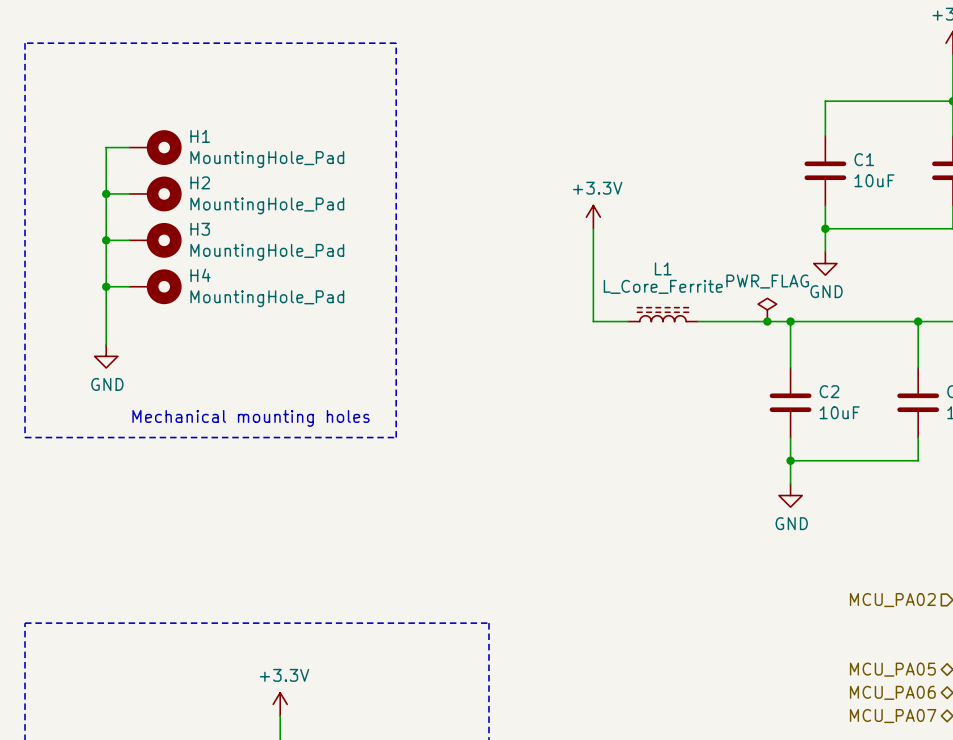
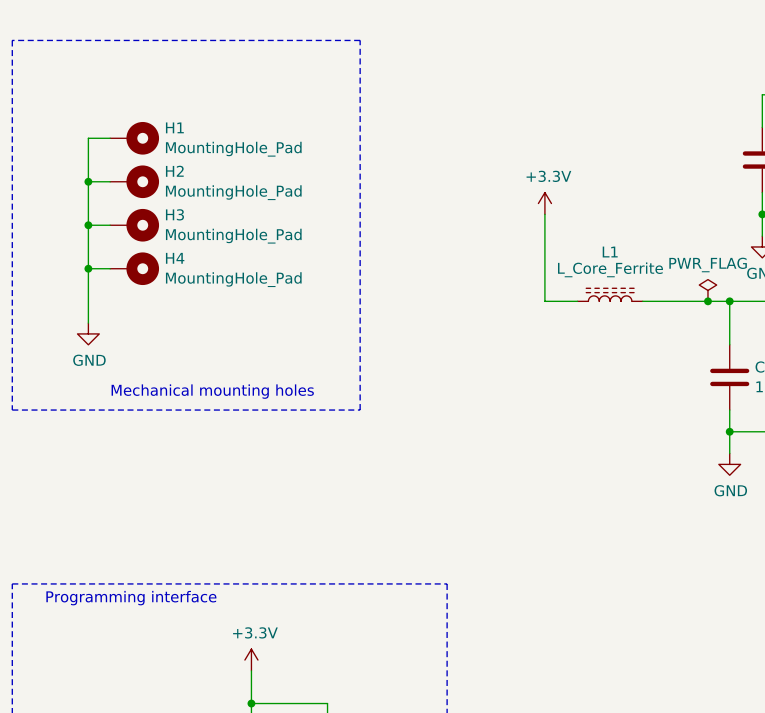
text: none -> Programming interface (131, 598)

